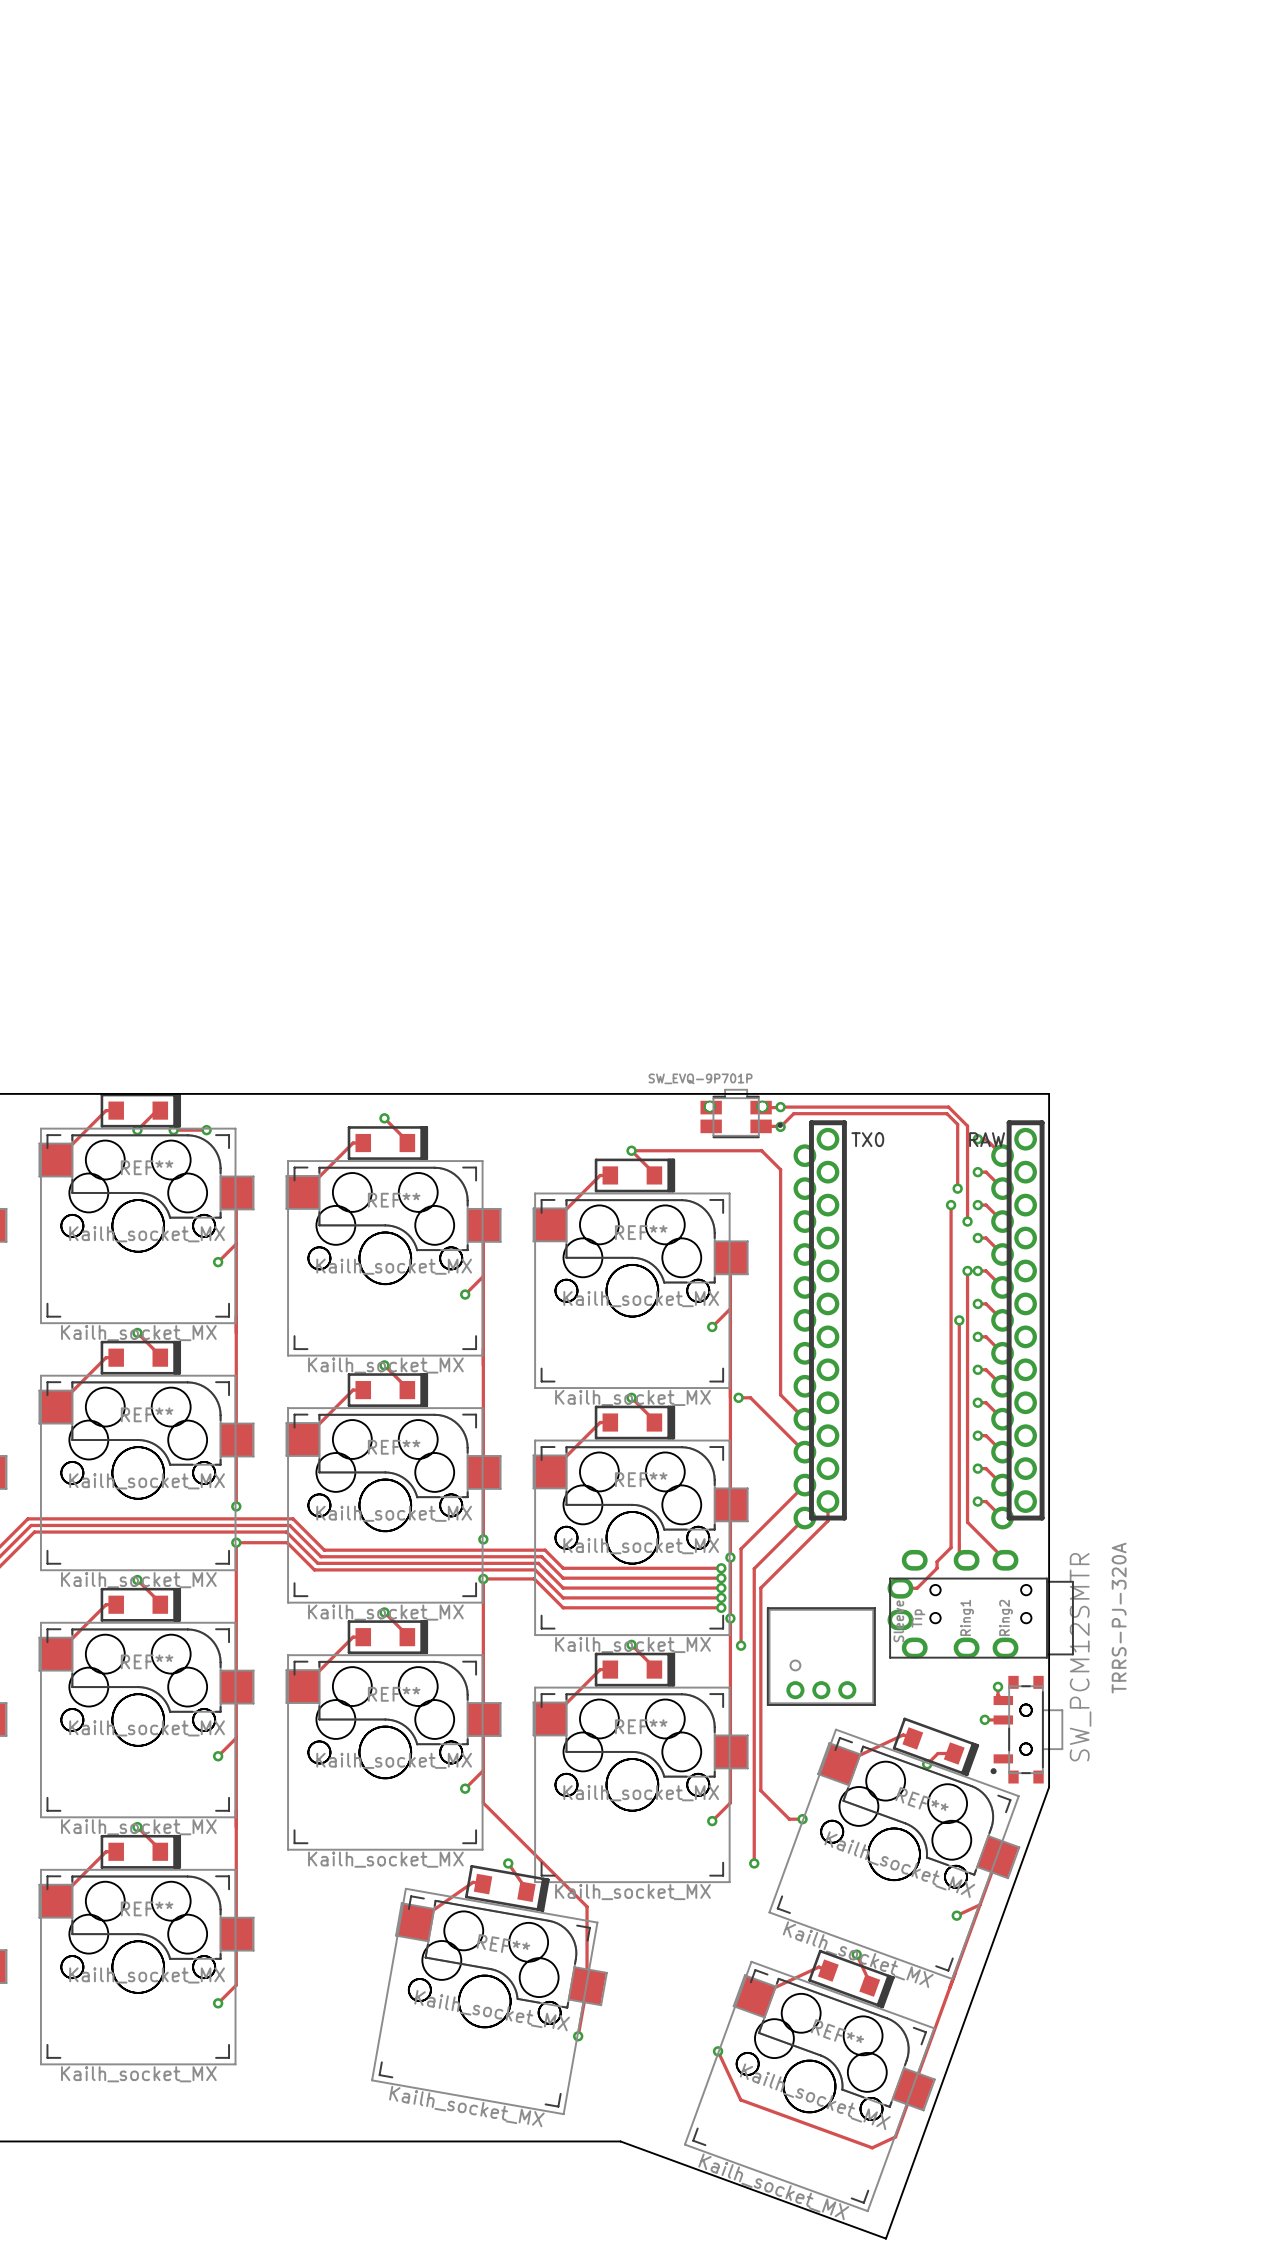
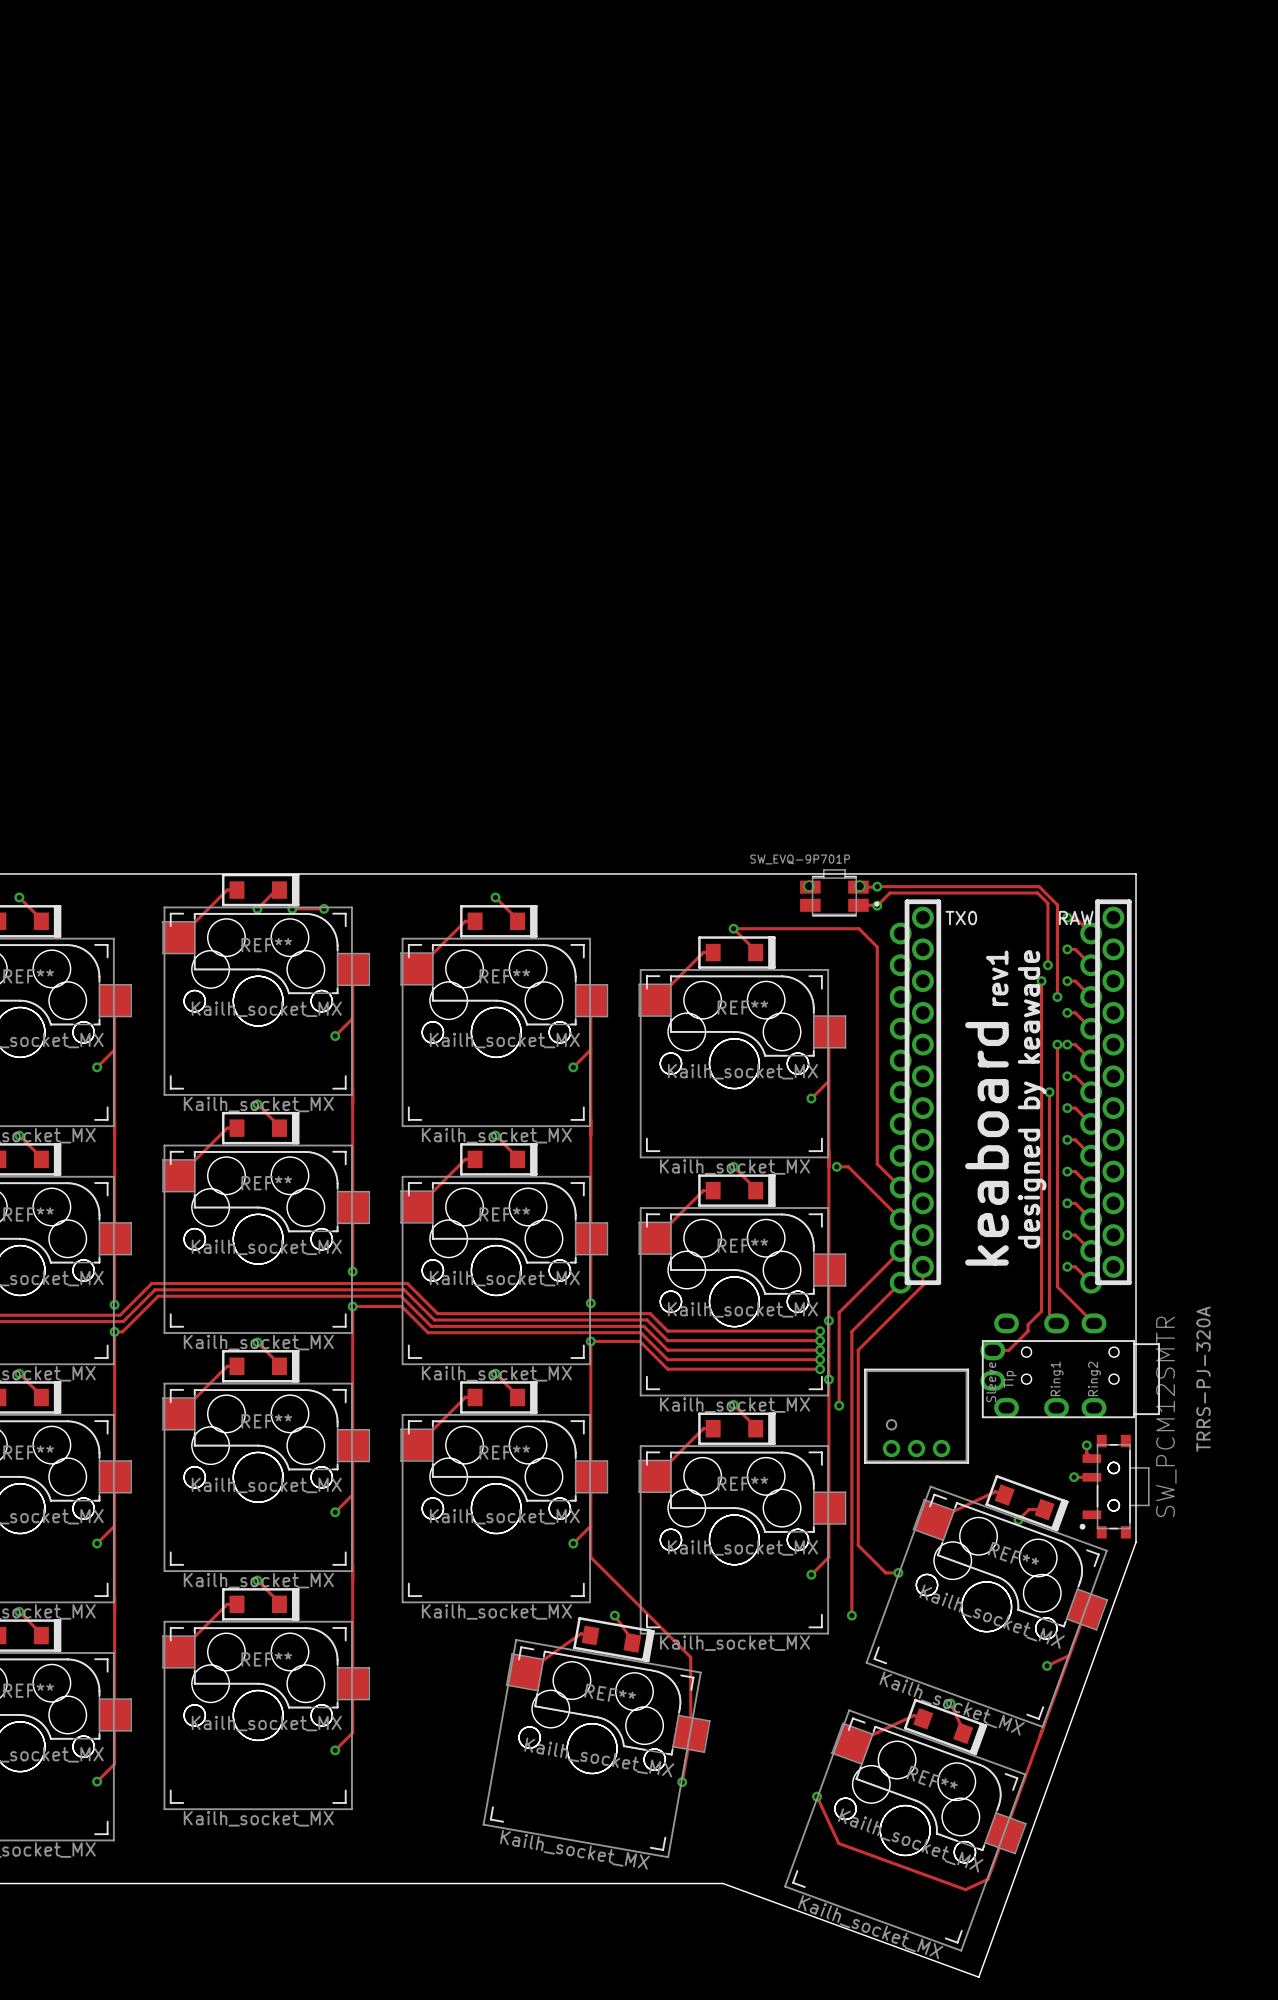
text: none -> rev1 (997, 978)
text: none -> designed by keawade (1032, 1099)
text: none -> keaboard (986, 1143)

